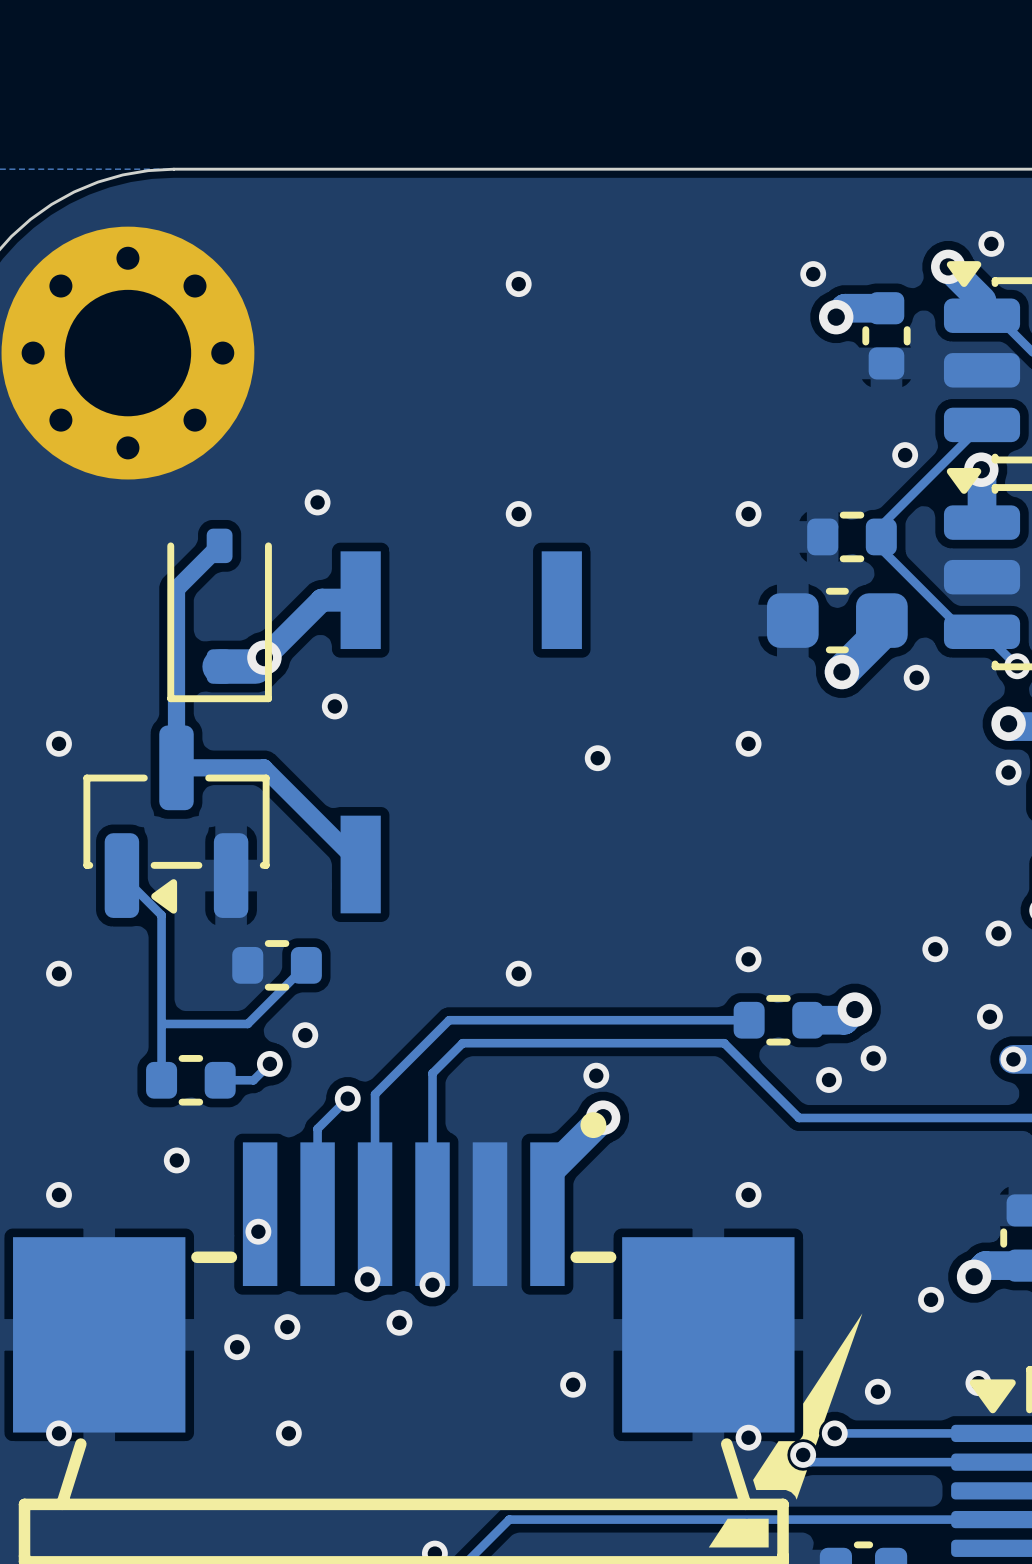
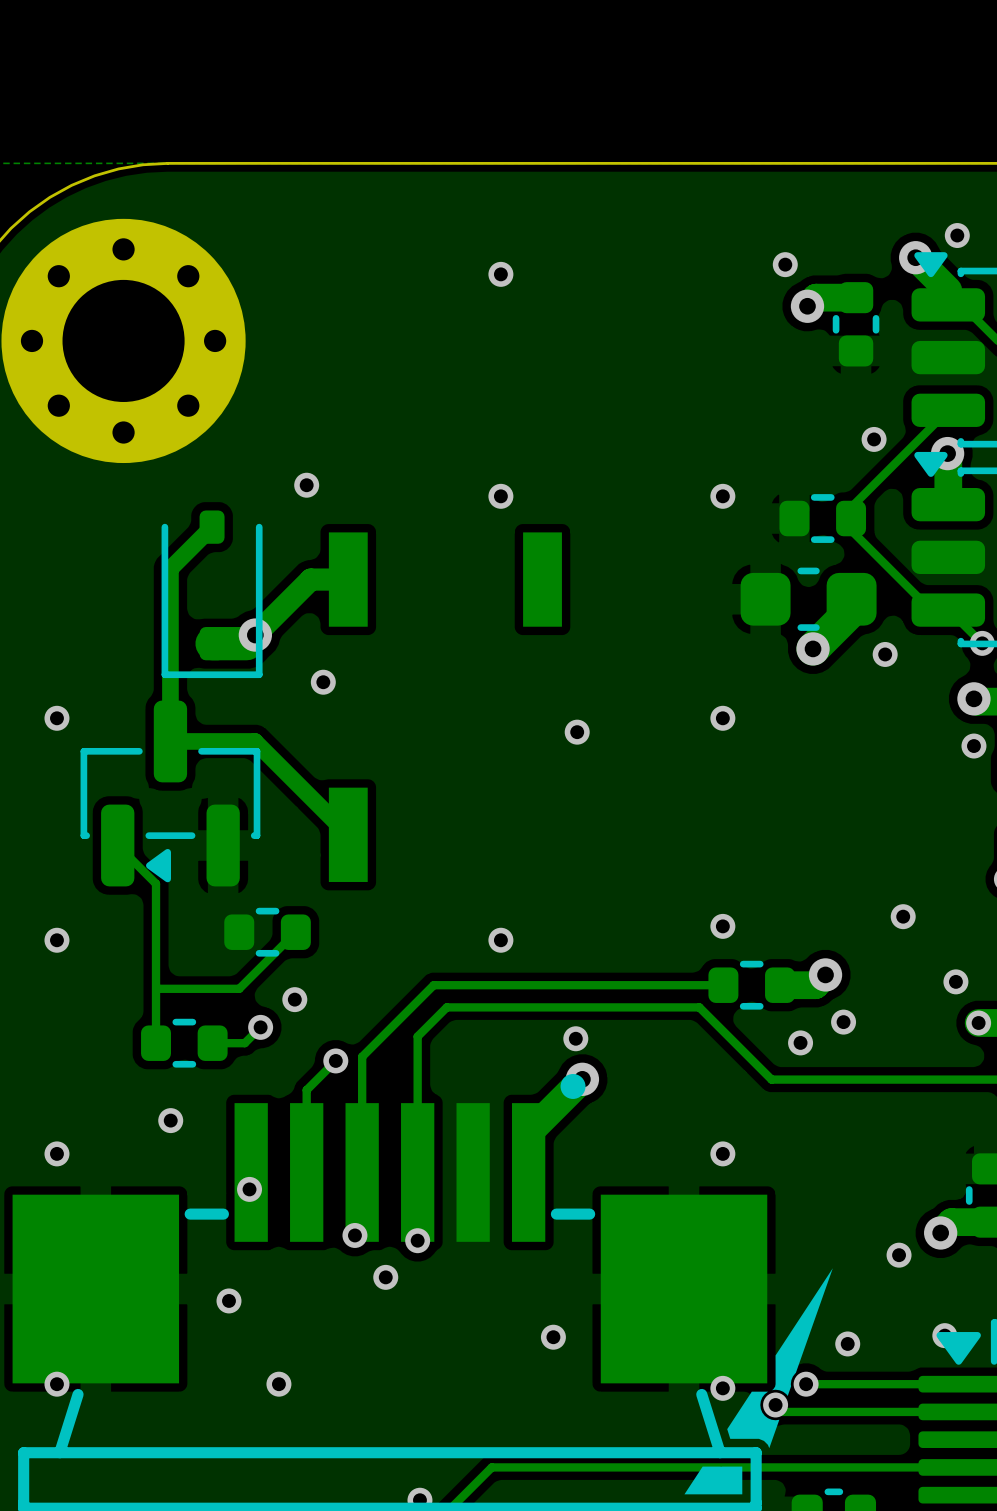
via: (998, 933) -> none
via: (287, 1327) -> none

